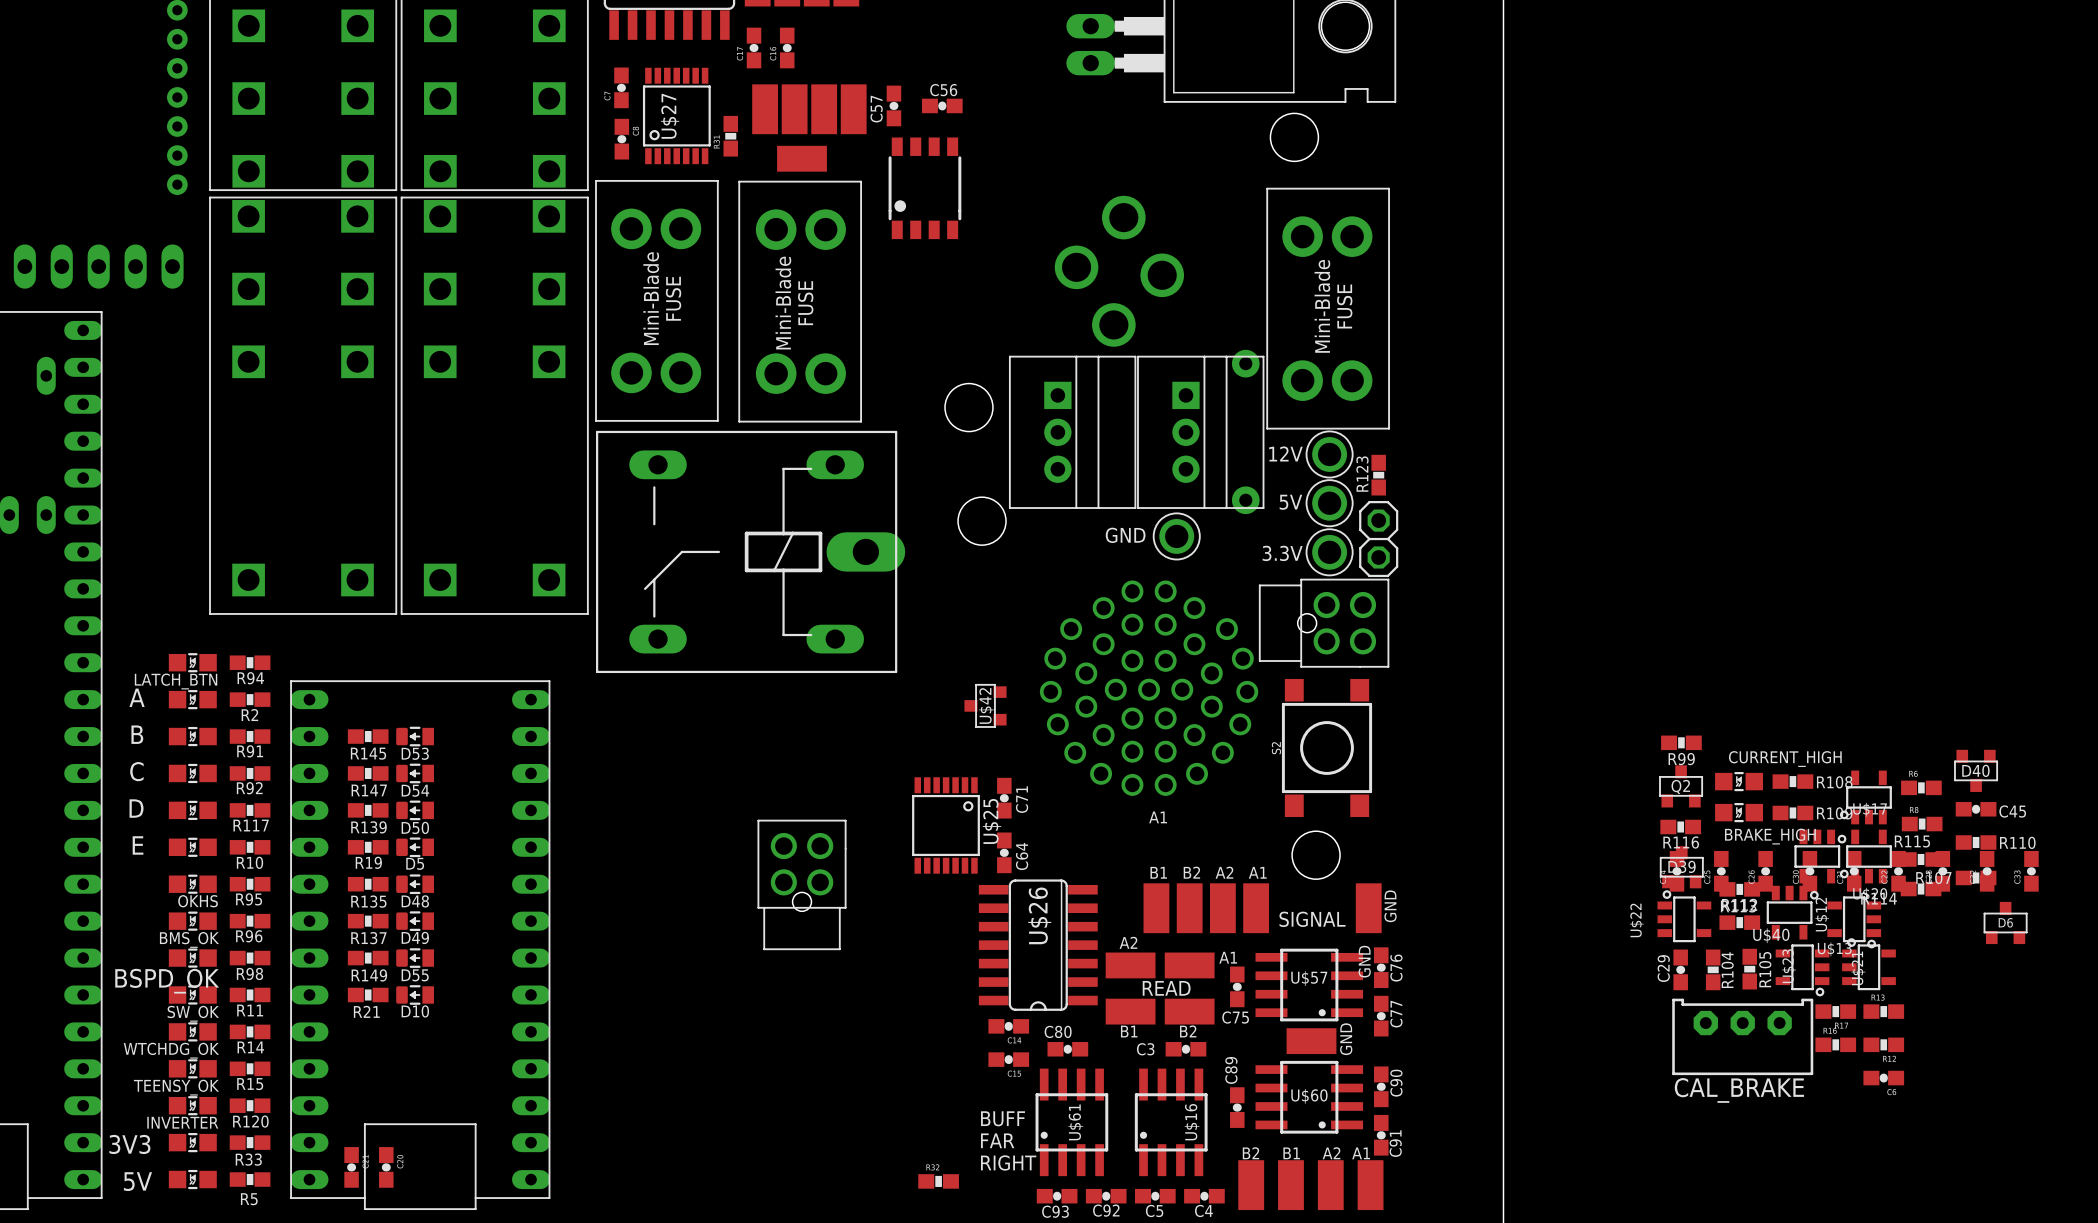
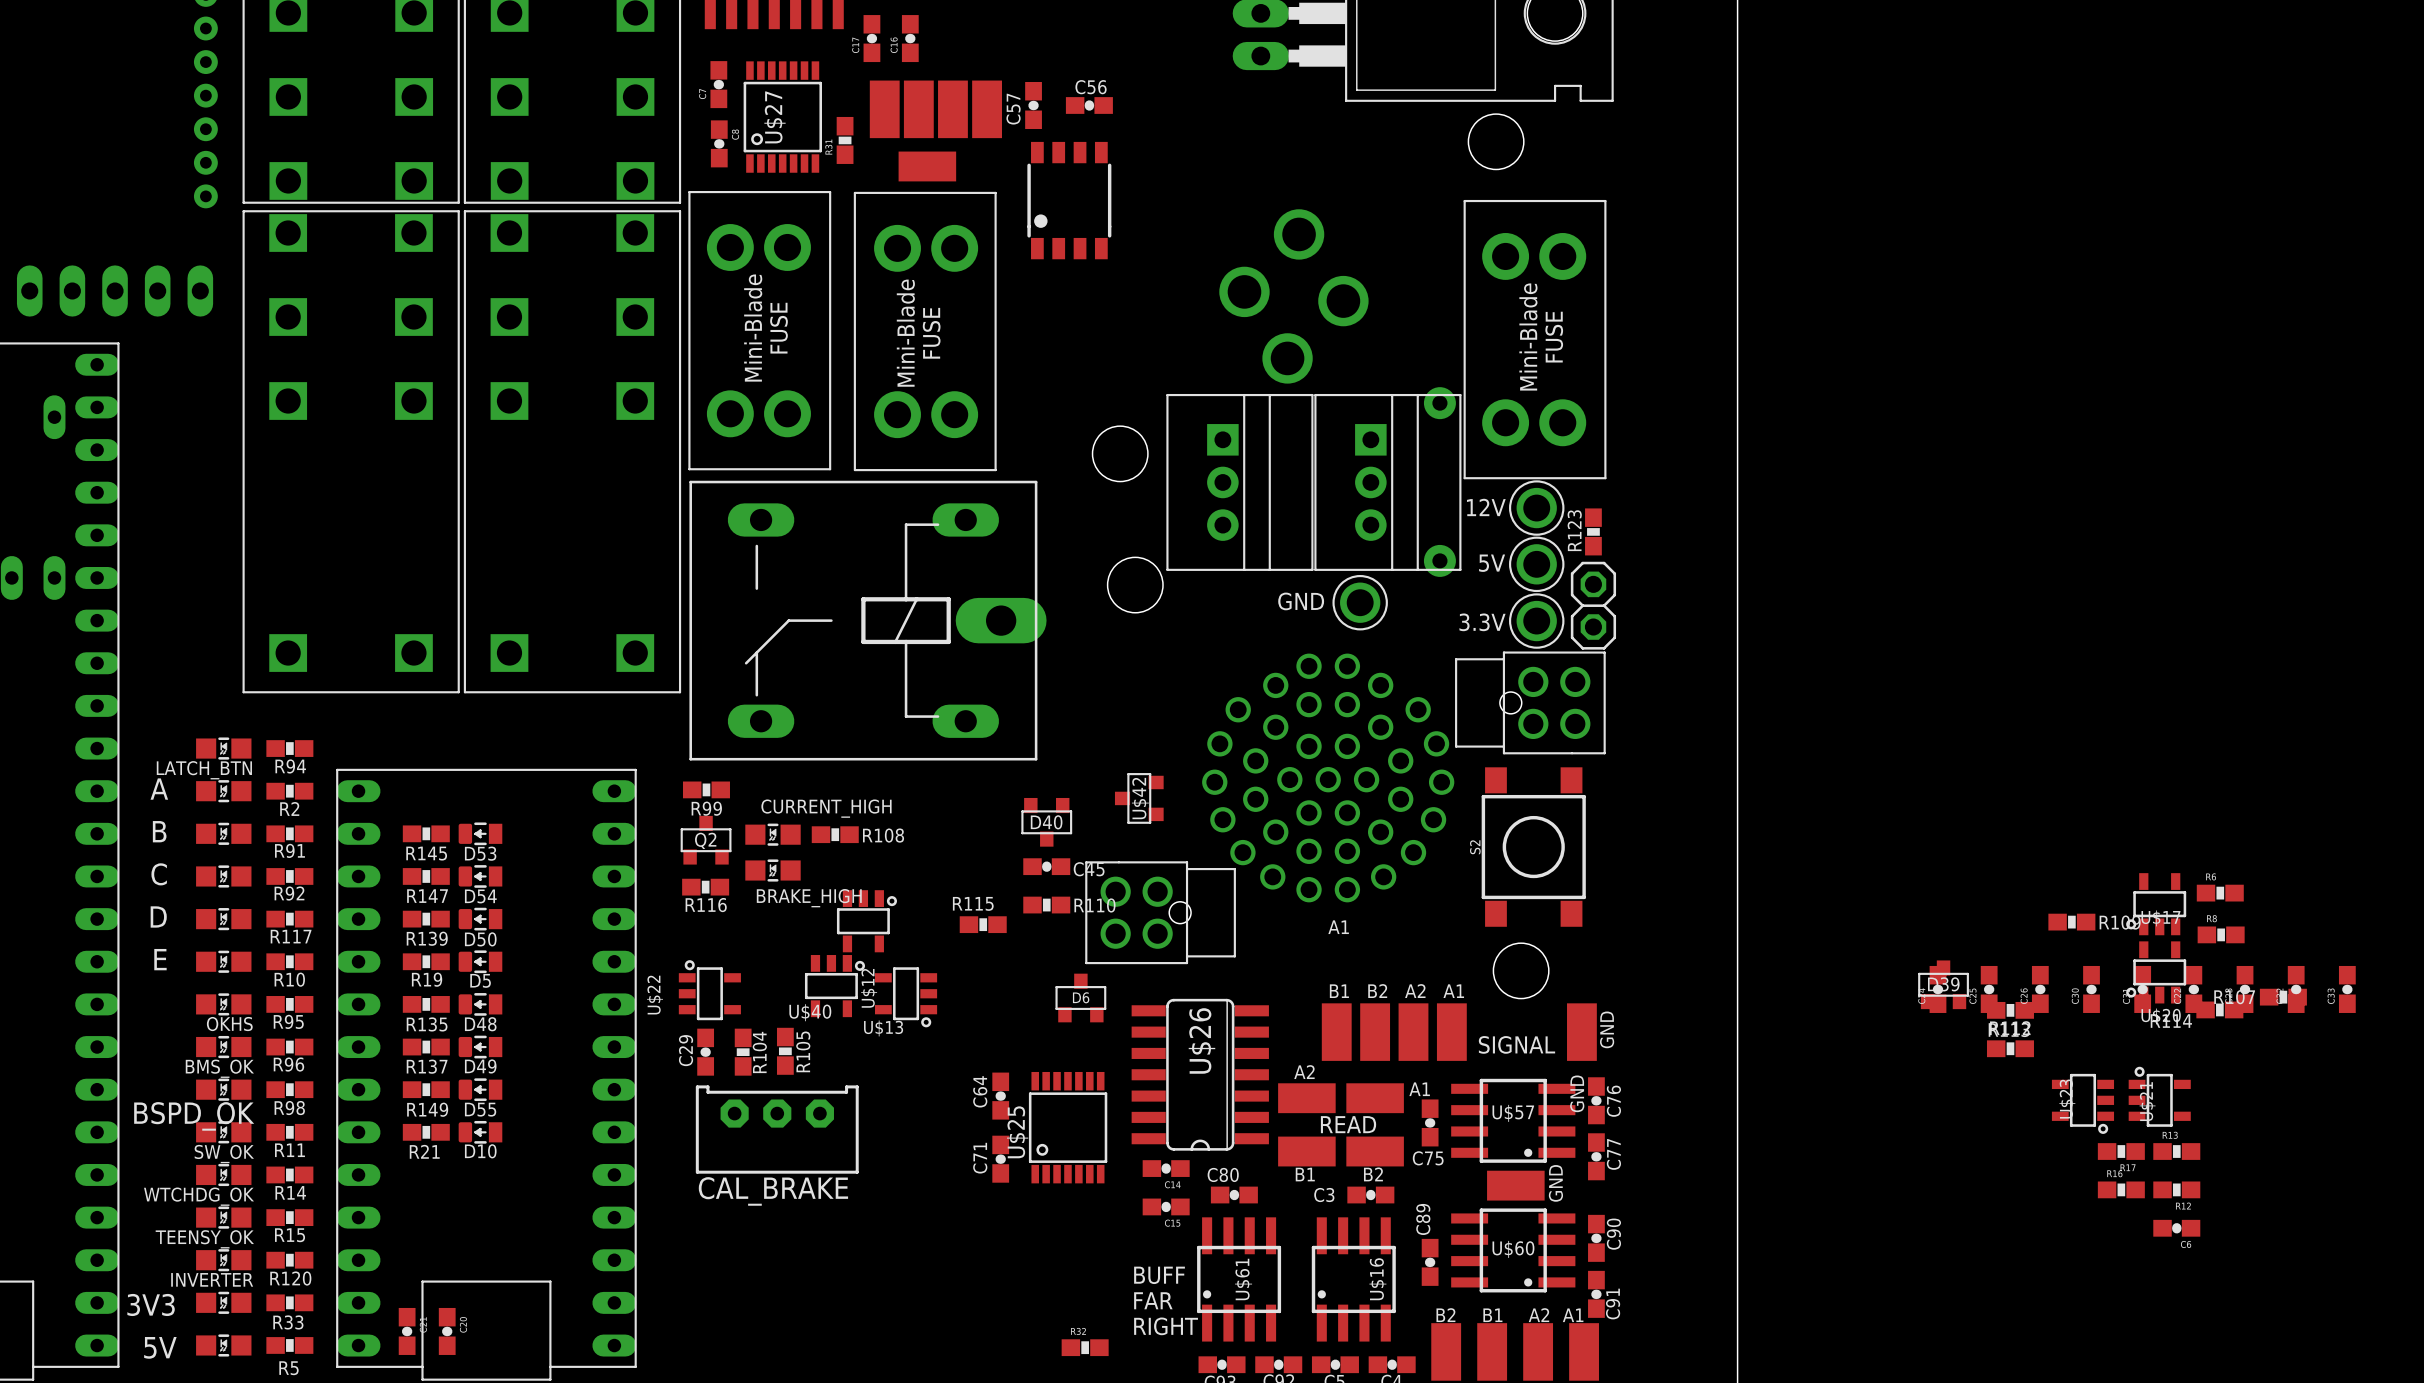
CURRENT_HIGH: none -> (773, 834)
R99 position: (1681, 742) -> (706, 789)
BRAKE_HIGH: none -> (773, 870)
D40 position: (1976, 770) -> (1046, 822)
CURRENT_HIGH: (1739, 781) -> none
R108 position: (1792, 781) -> (835, 834)
Q2 position: (1681, 786) -> (706, 840)
C71 position: (1004, 798) -> (1000, 1159)
C71 name position: C71 (1022, 799) -> C71 (980, 1158)
C45 position: (1976, 809) -> (1046, 866)
BRAKE_HIGH: (1739, 812) -> none
U$25 rotation: 0° (946, 825) -> 180° (1068, 1127)
U$25 position: (946, 825) -> (1068, 1127)
R116 position: (1680, 827) -> (705, 887)
R110 position: (1976, 842) -> (1046, 905)
C64 position: (1004, 852) -> (1000, 1096)
C64 name position: C64 (1022, 856) -> C64 (980, 1091)
U$13 position: (1820, 856) -> (866, 921)
R115 position: (1921, 859) -> (983, 924)
part rotation: 0° (802, 884) -> 90° counterclockwise (1160, 912)
part position: (802, 884) -> (1160, 912)
U$40 position: (1792, 912) -> (834, 986)
U$22 position: (1684, 916) -> (709, 990)
U$12 position: (1854, 922) -> (906, 997)
D6 position: (2005, 922) -> (1080, 998)
C29 position: (1680, 969) -> (705, 1052)
R104 position: (1713, 969) -> (743, 1052)
R105 position: (1749, 969) -> (785, 1051)
CAL_BRAKE: none -> (777, 1129)
CAL_BRAKE: (1742, 1036) -> none

